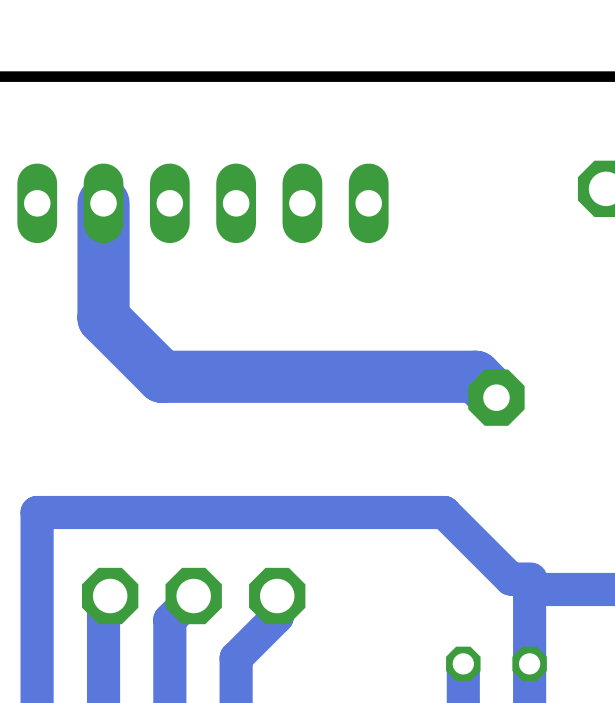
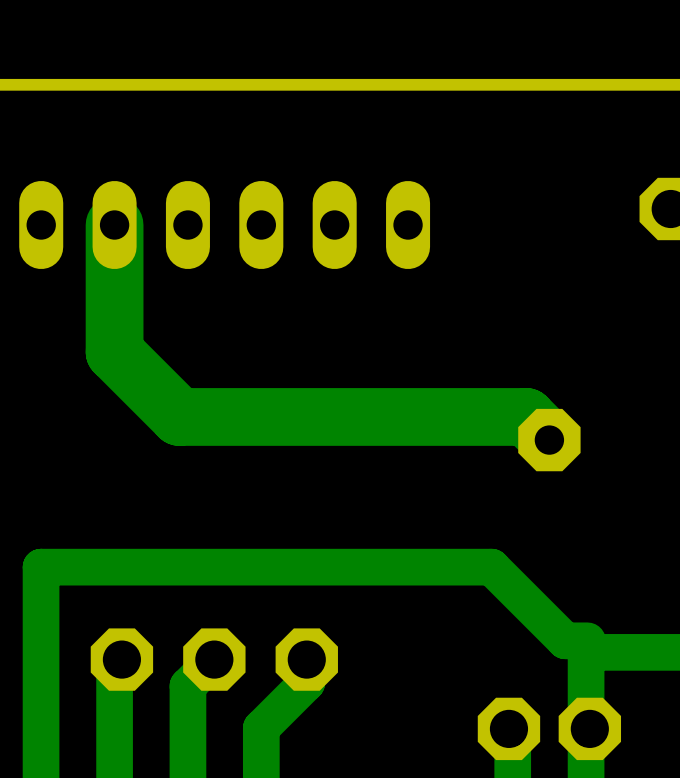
part: none -> (508, 728)
part: none -> (589, 728)

